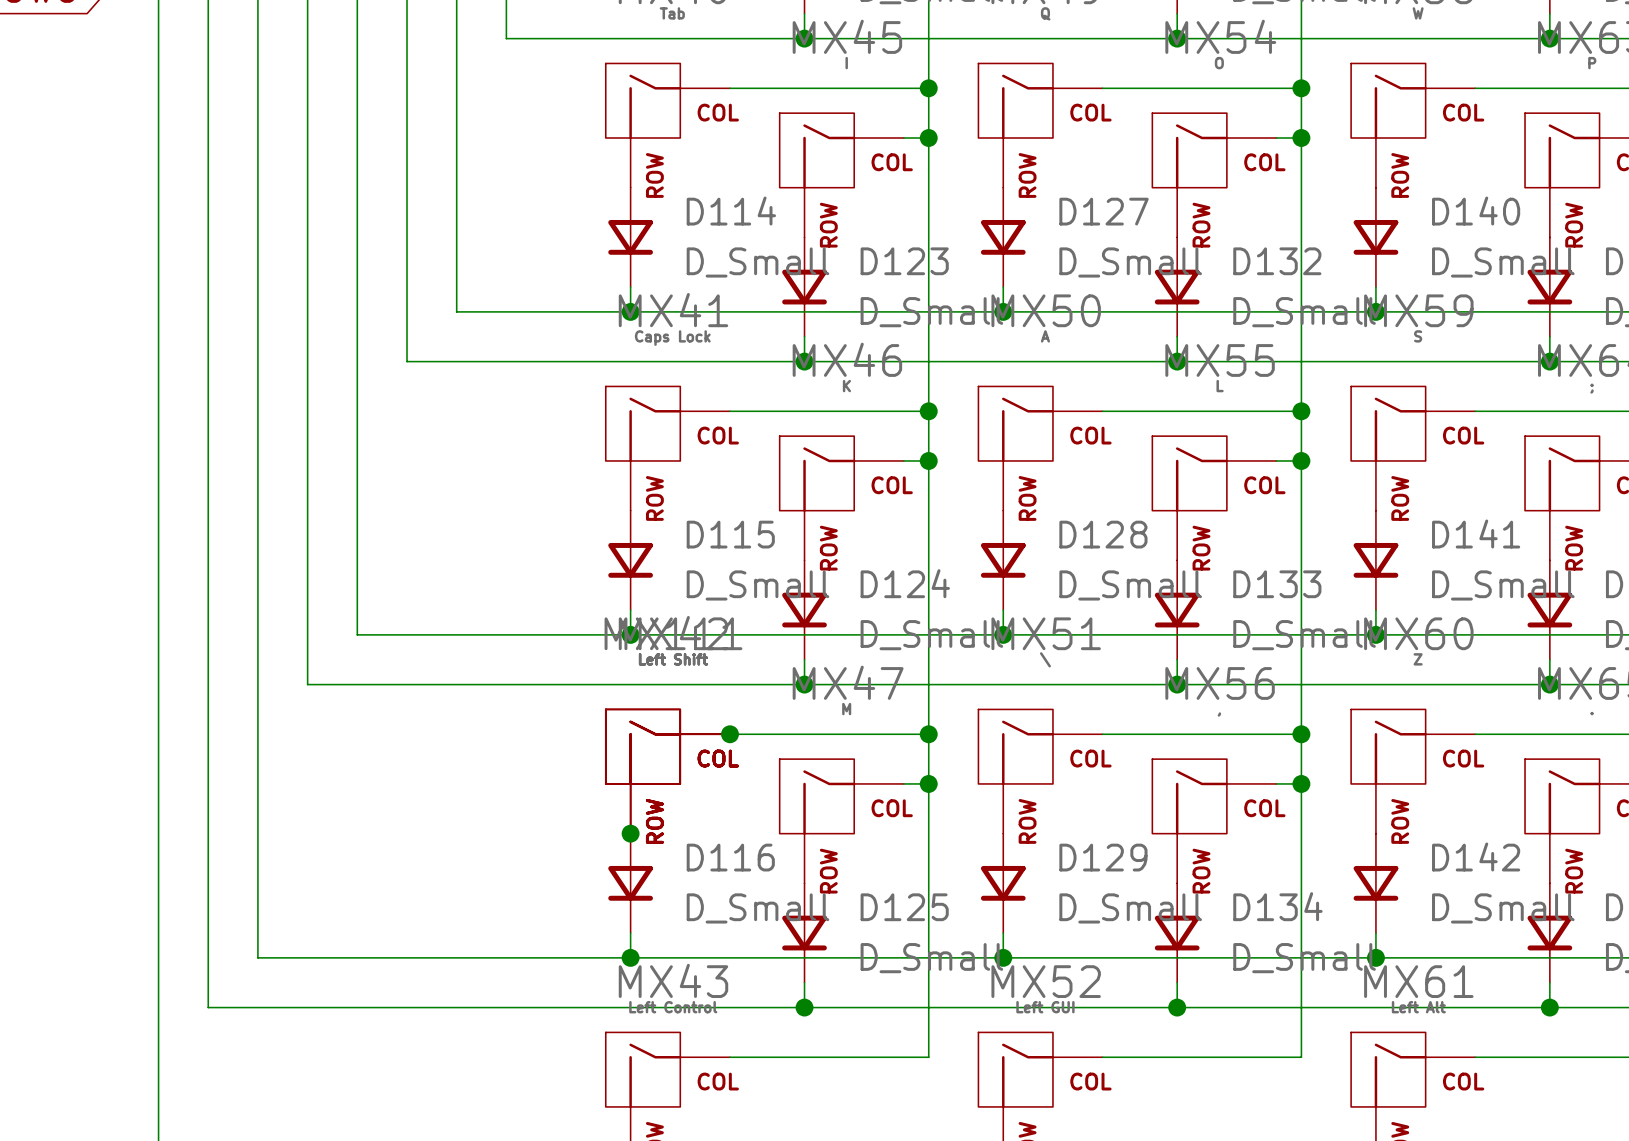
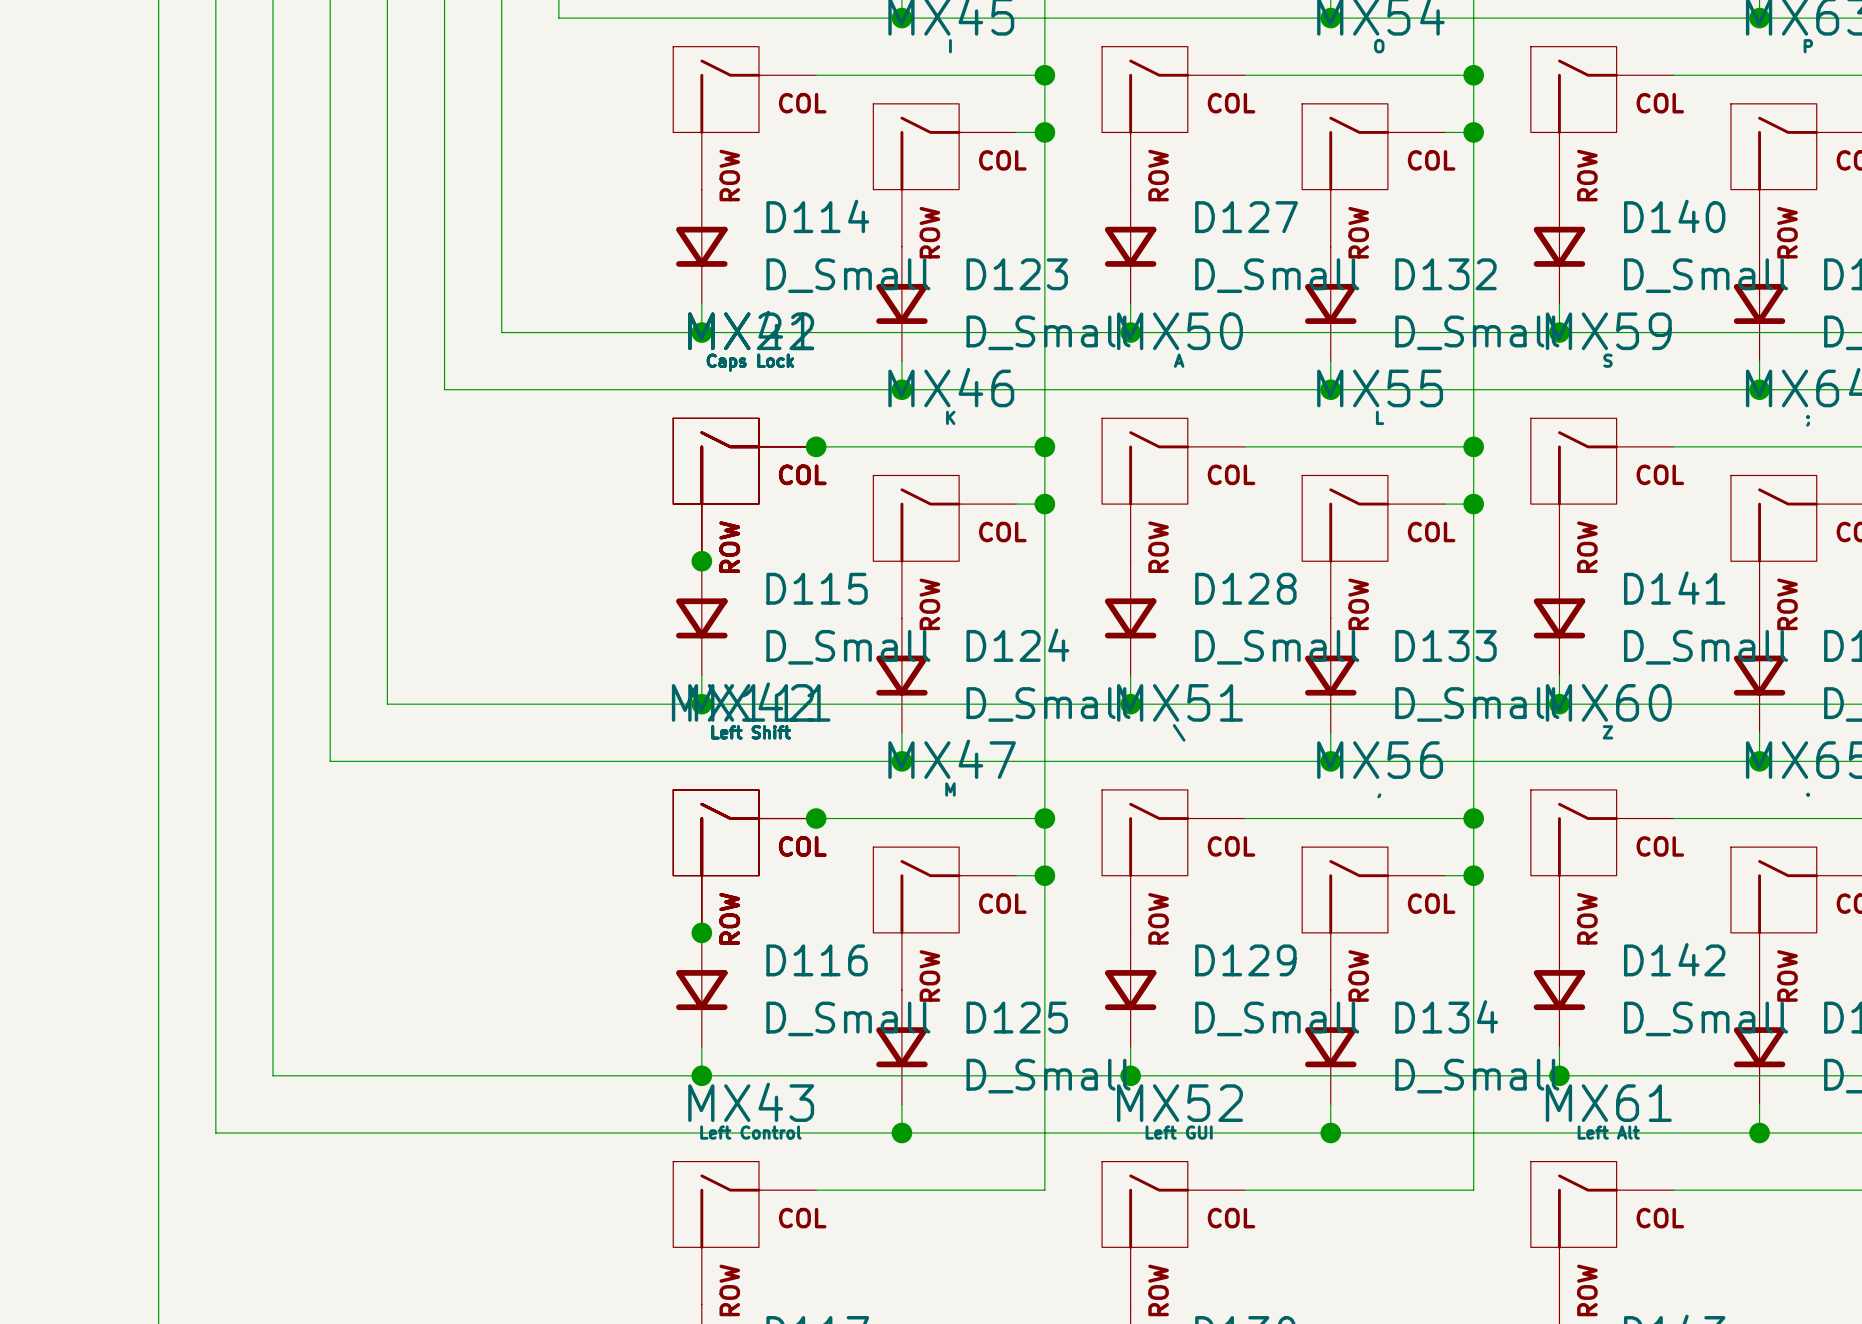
junction: none -> (816, 446)
part: none -> Caps Lock (744, 489)
junction: none -> (701, 561)

